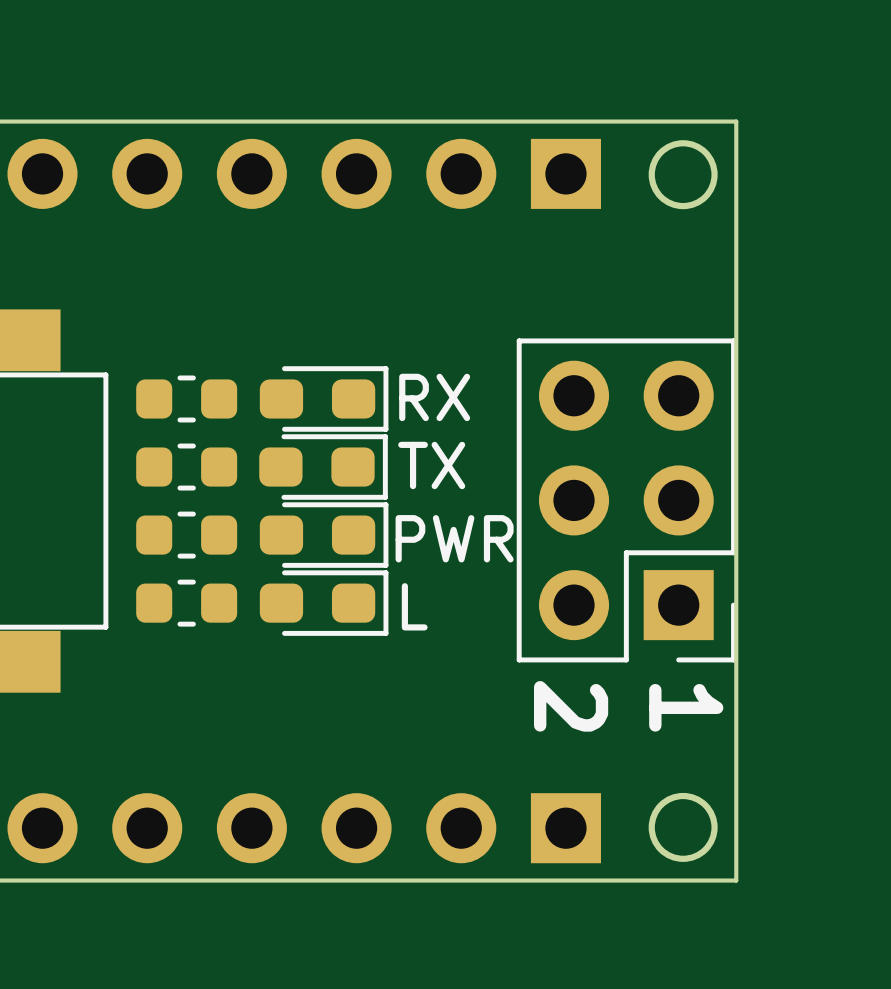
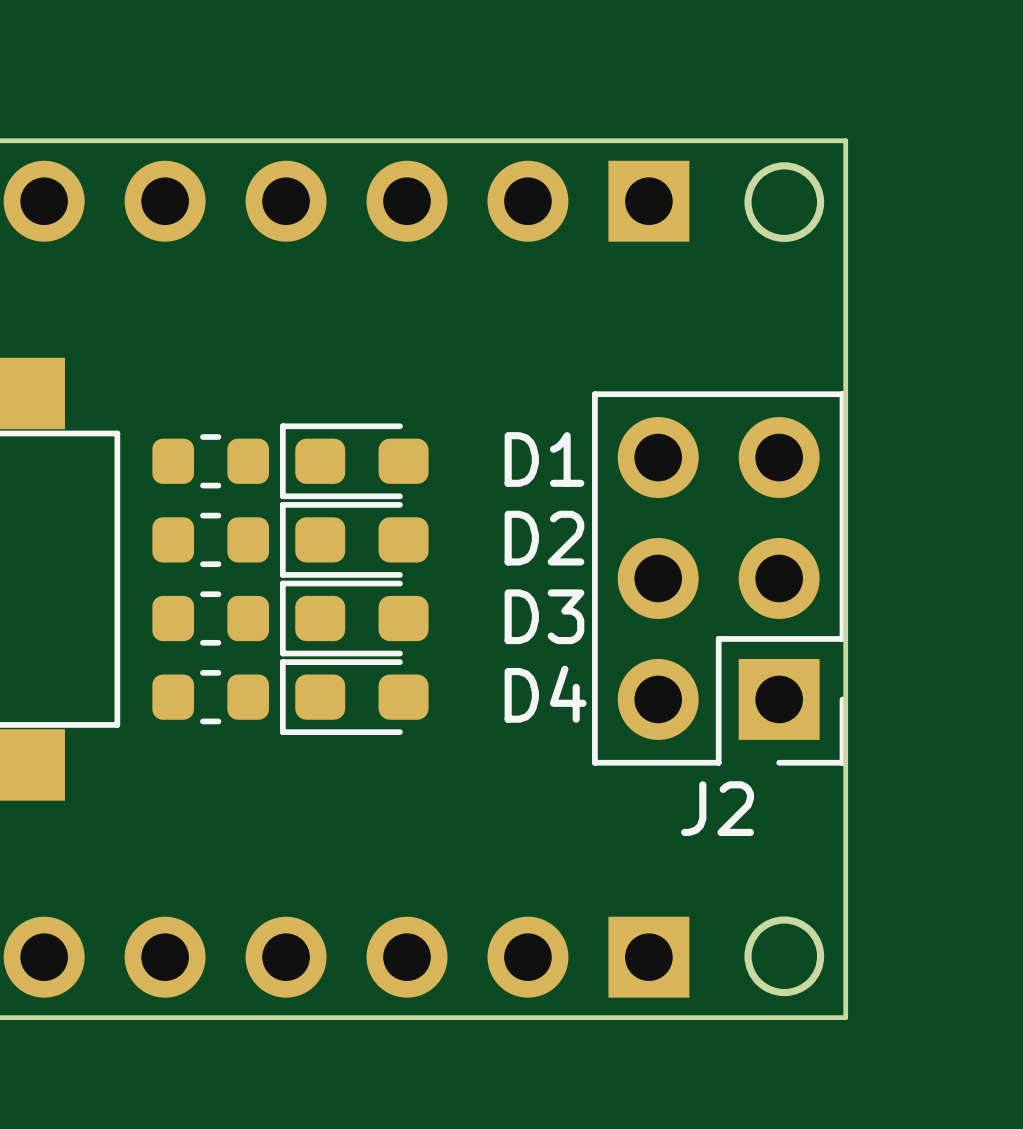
D1: none -> (354, 461)
part: RX (324, 398) -> none
D2: none -> (354, 539)
part: TX (323, 467) -> none
D3: none -> (354, 618)
part: PWR (324, 535) -> none
D4: none -> (354, 697)
part: L (324, 603) -> none
J2 name: none -> J2 (717, 808)
text: 2 (571, 706) -> none
text: 1 (686, 707) -> none

